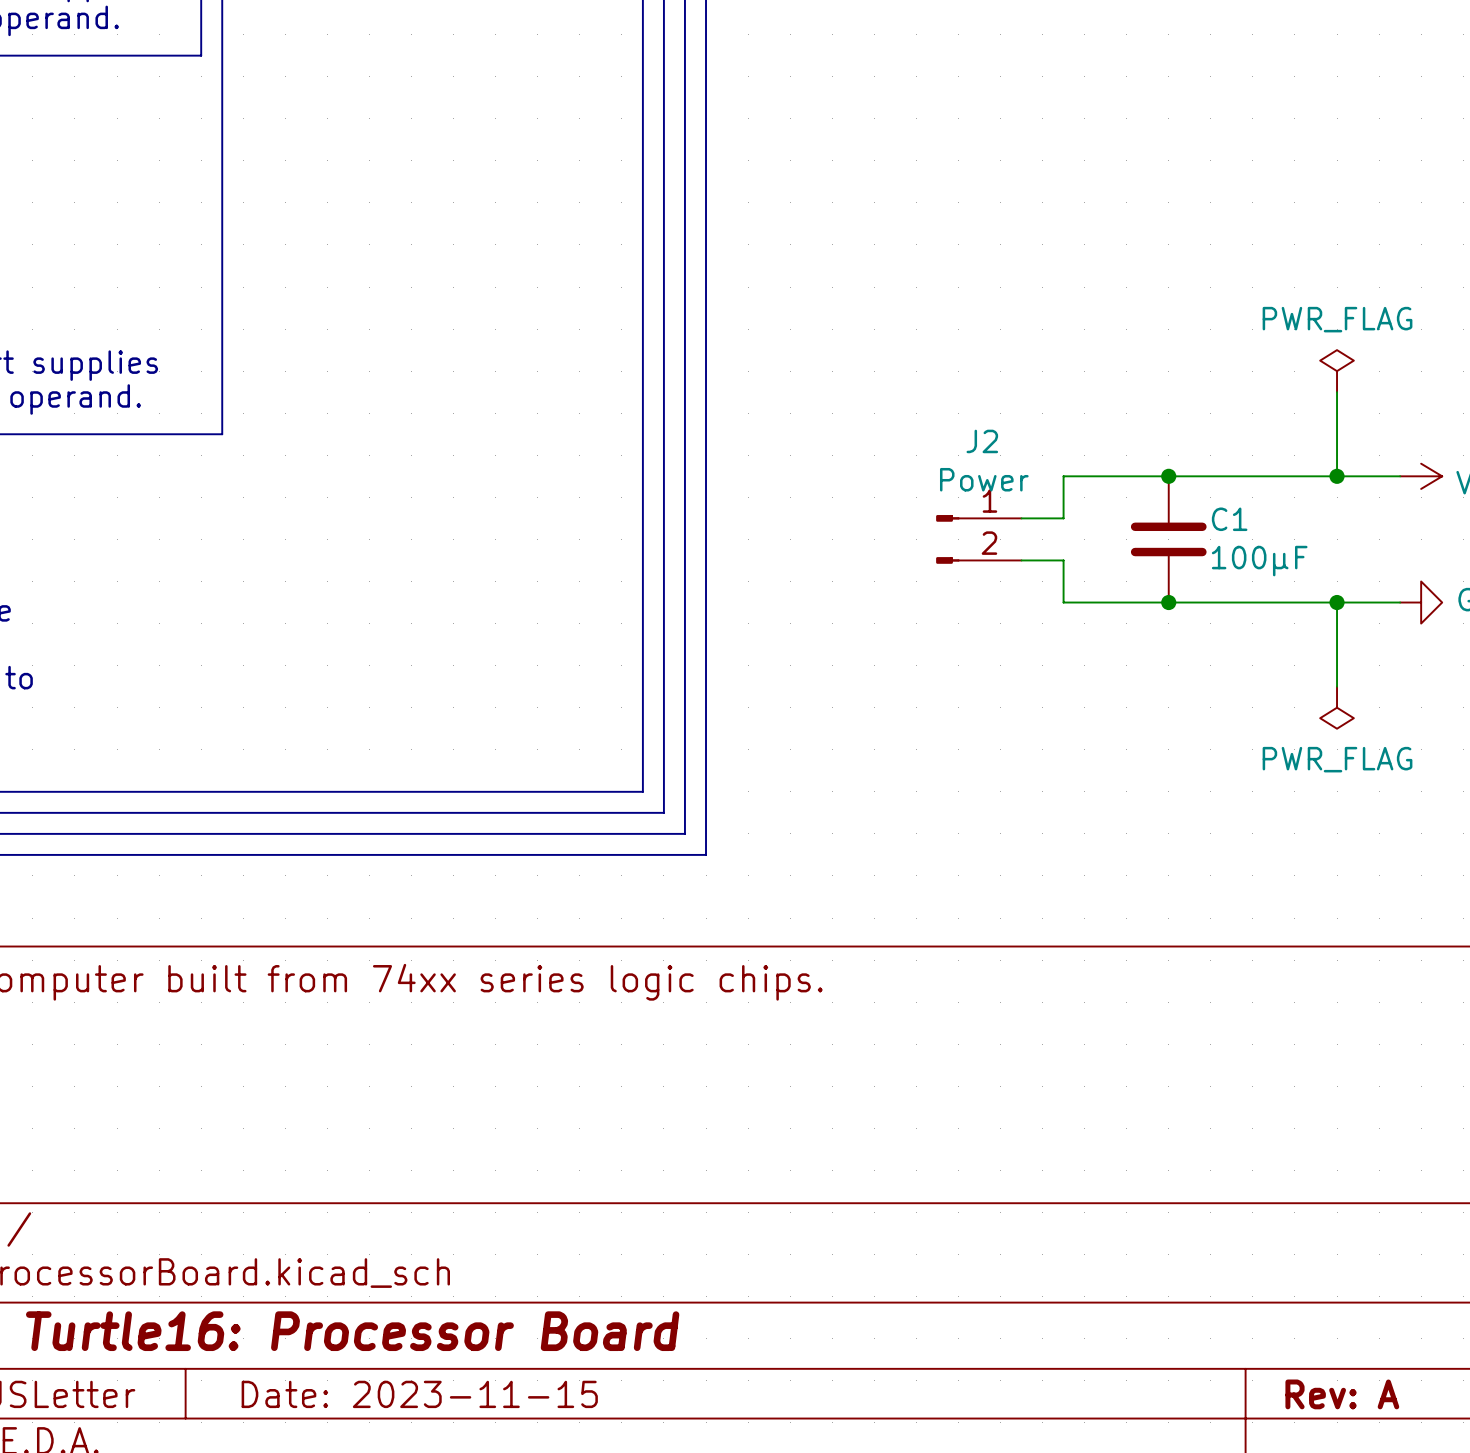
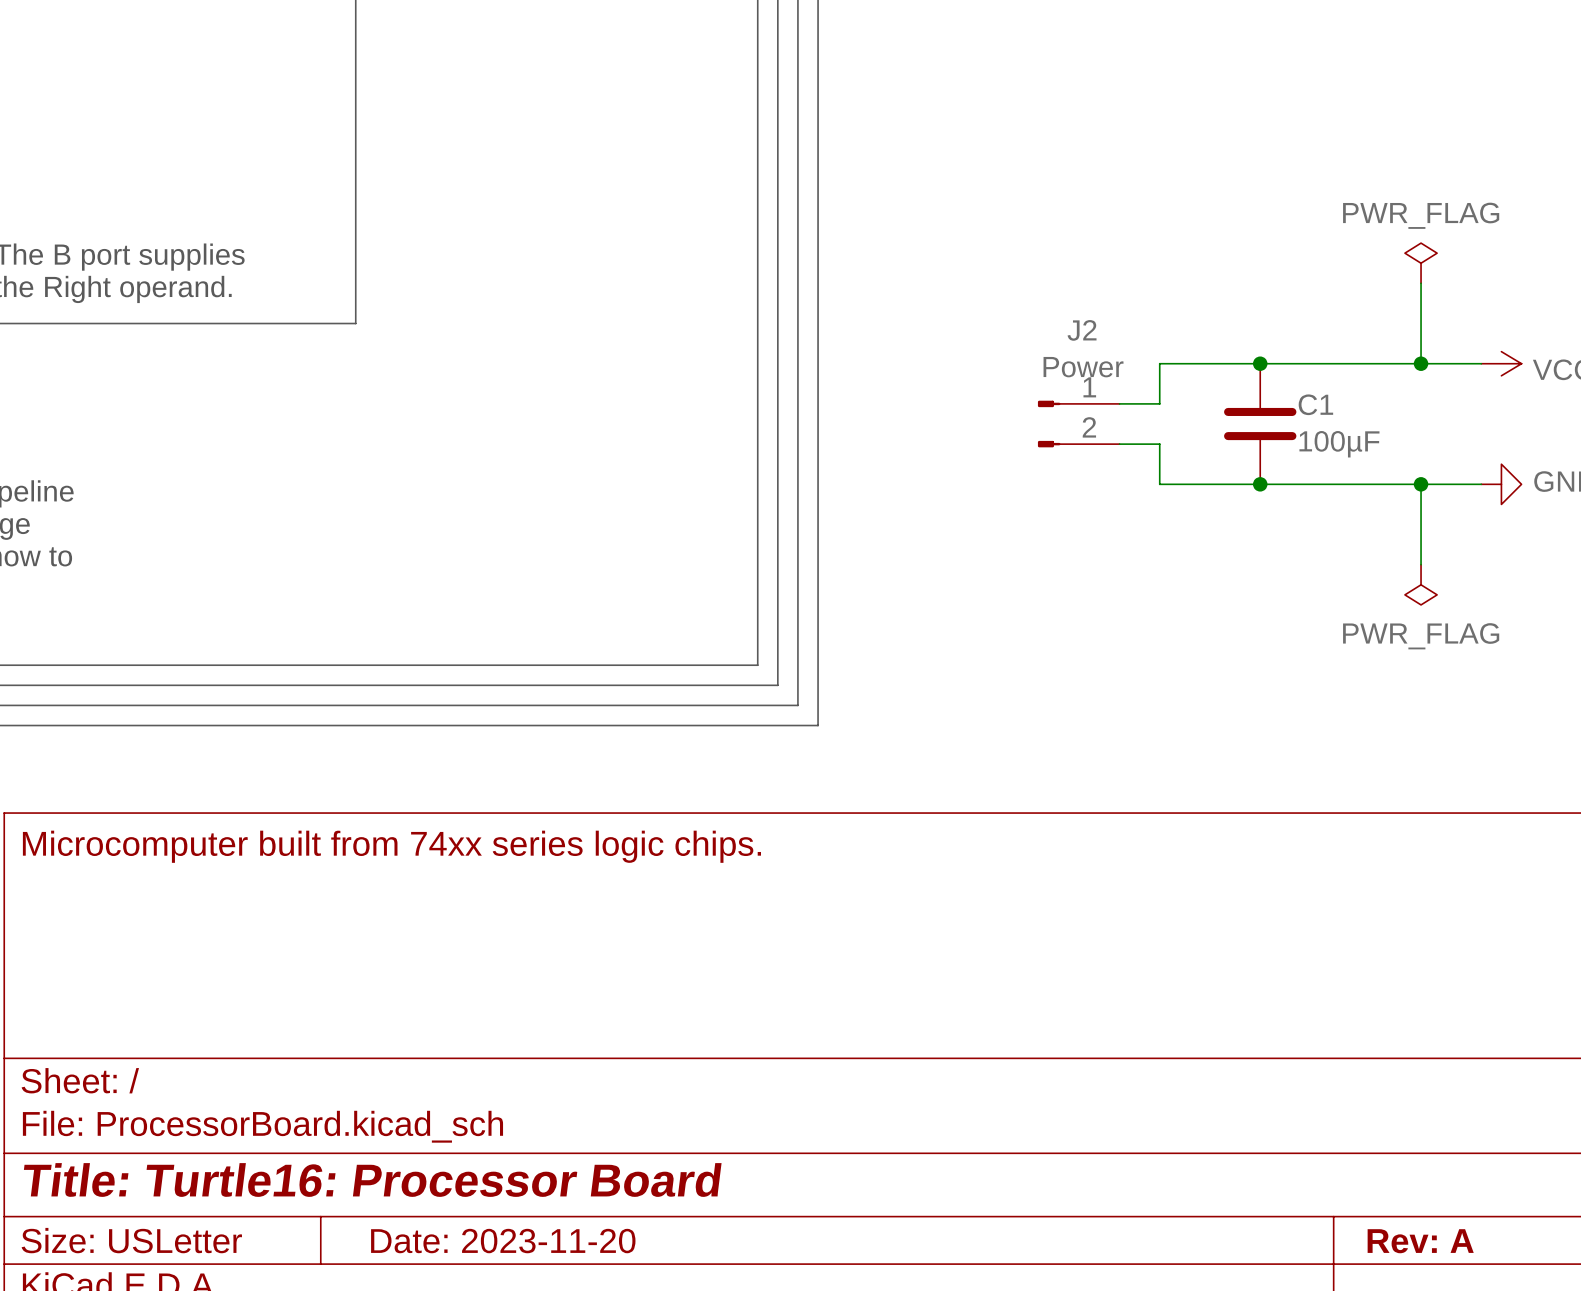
title block: Date: 2023-11-15 (419, 1394) -> Date: 2023-11-20 (503, 1241)

